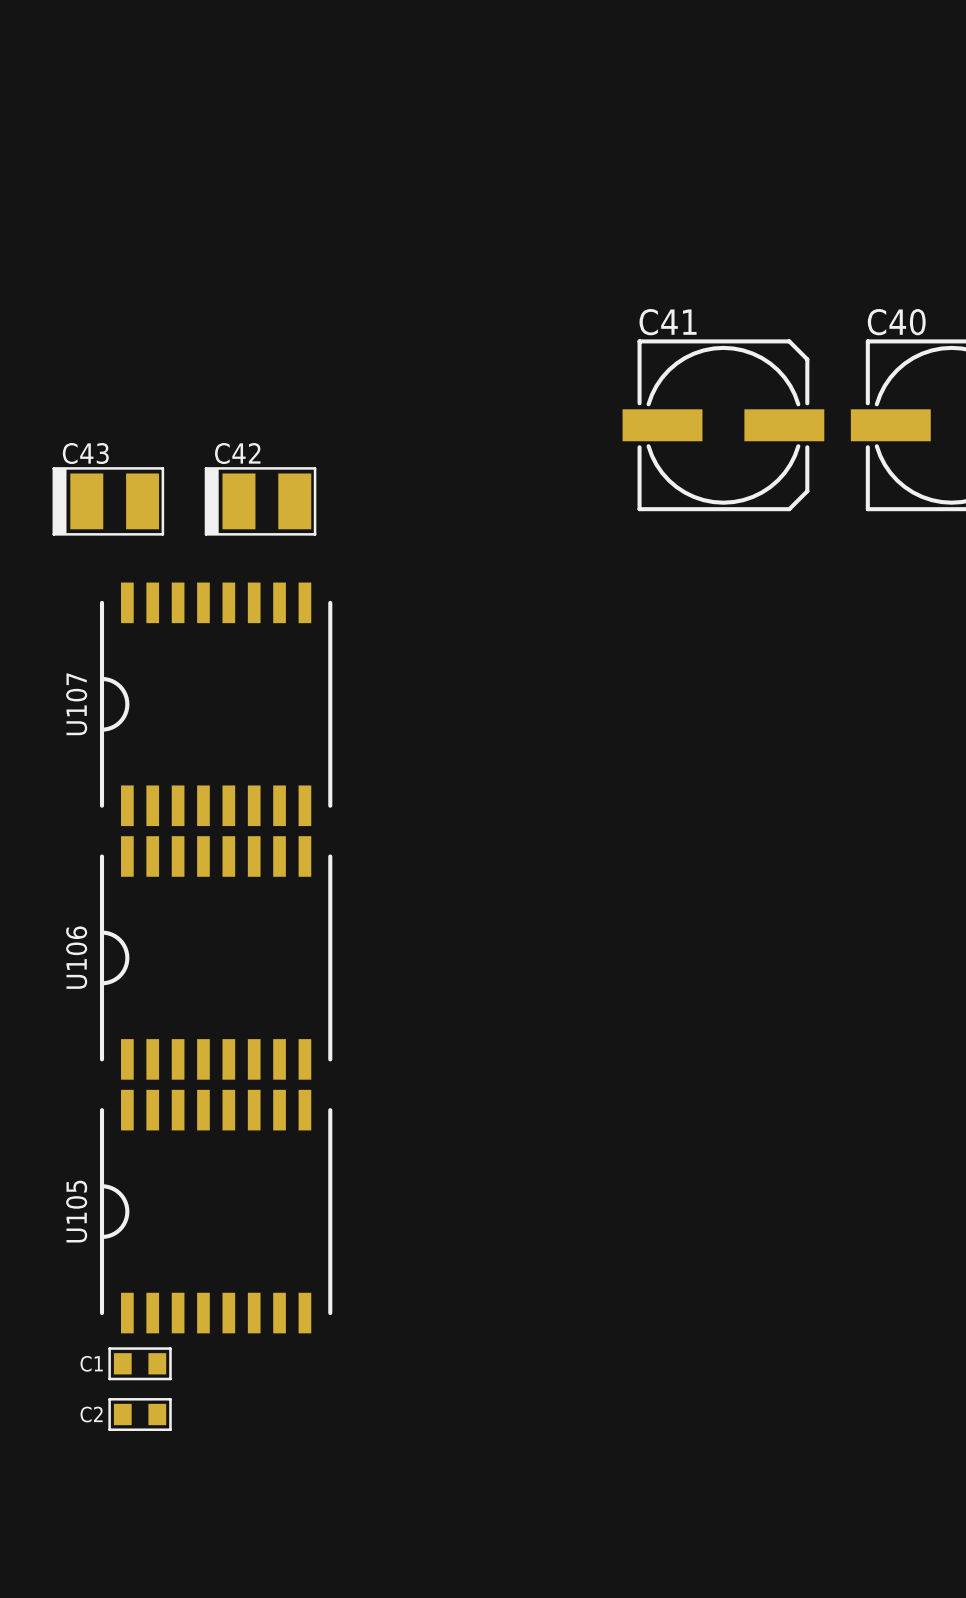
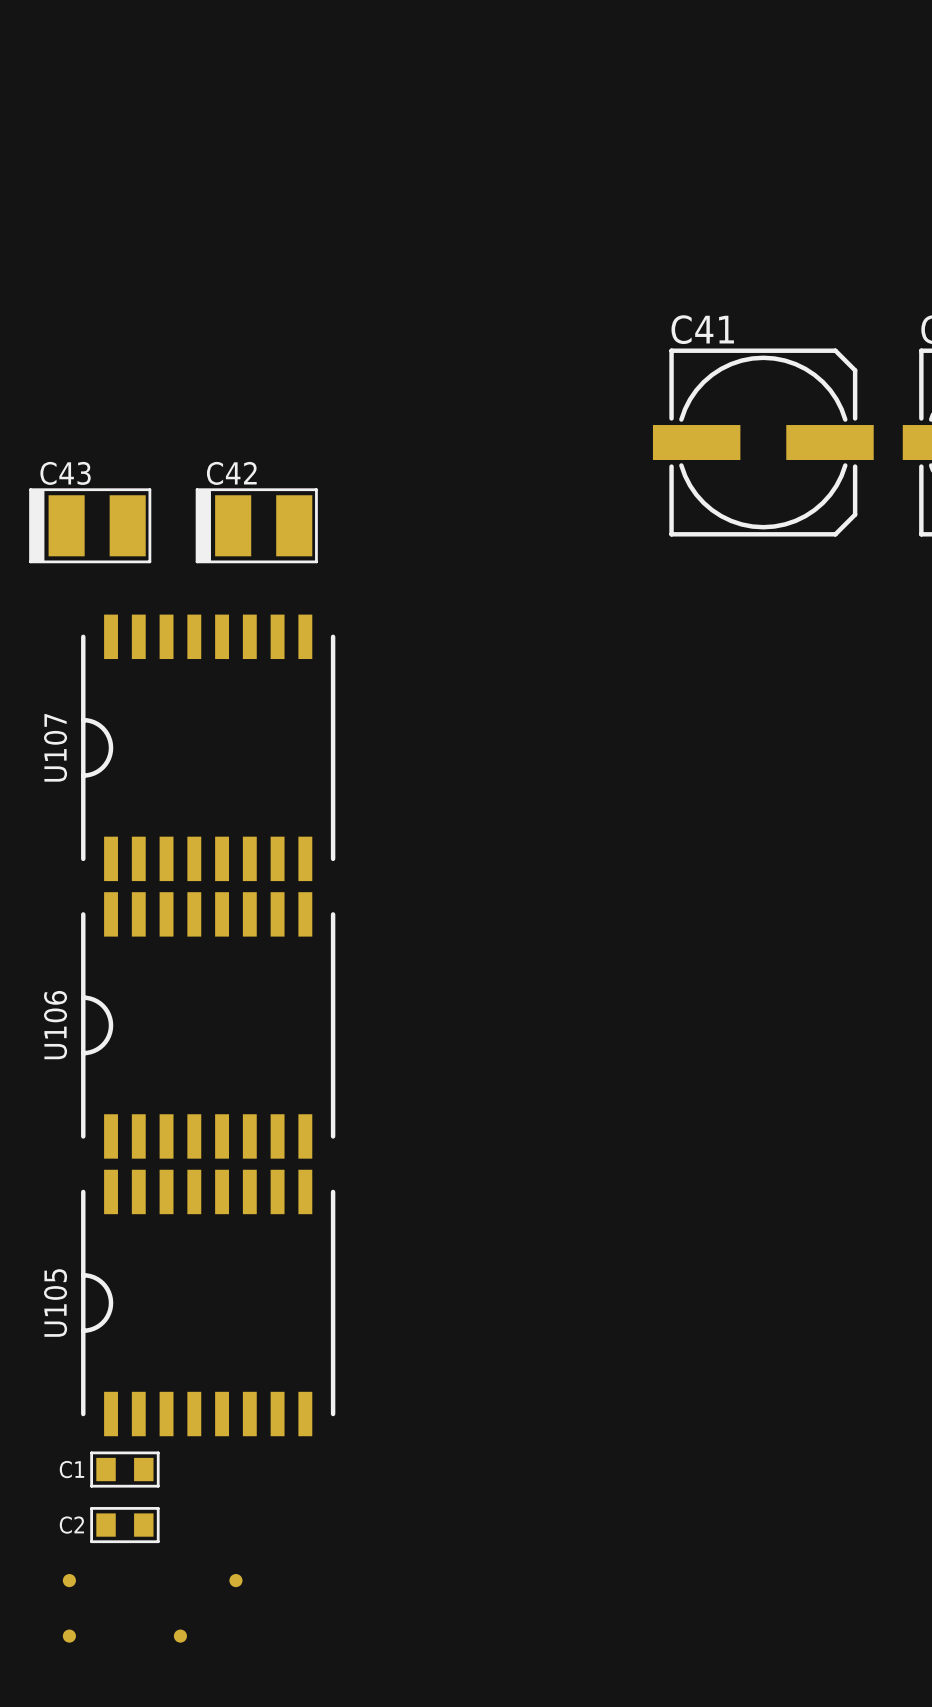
part: none -> (69, 1580)
part: none -> (235, 1580)
part: none -> (69, 1636)
part: none -> (180, 1636)

